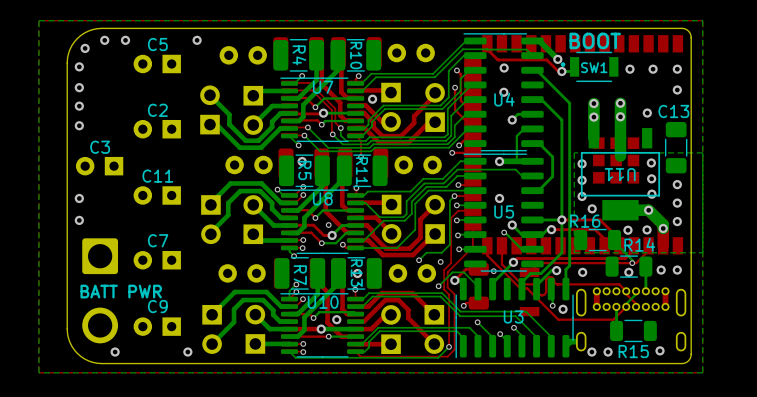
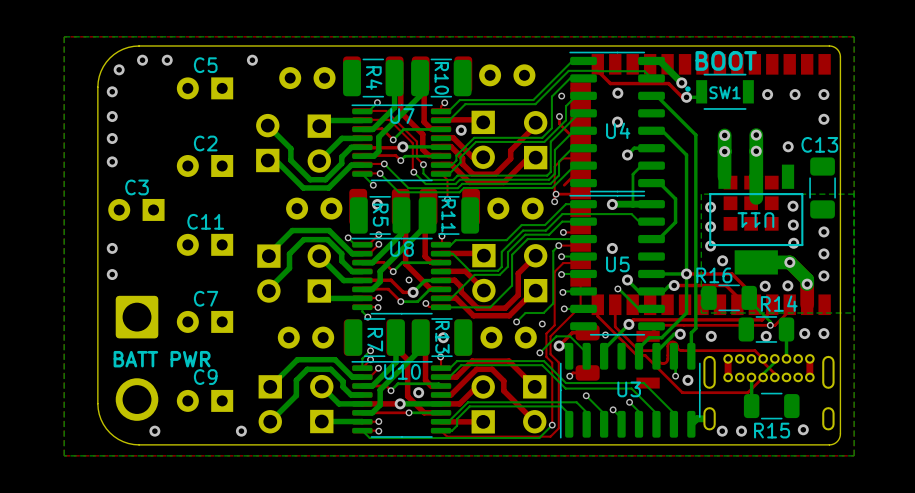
top track: (456, 70) (460, 74) (460, 100) (469, 108) -> none
top track: (455, 93) (455, 110) (467, 122) (472, 122) -> (559, 123) (576, 140)
top track: none -> (571, 158) (562, 158) (554, 166) (554, 201)
via position: (459, 145) -> (554, 201)

